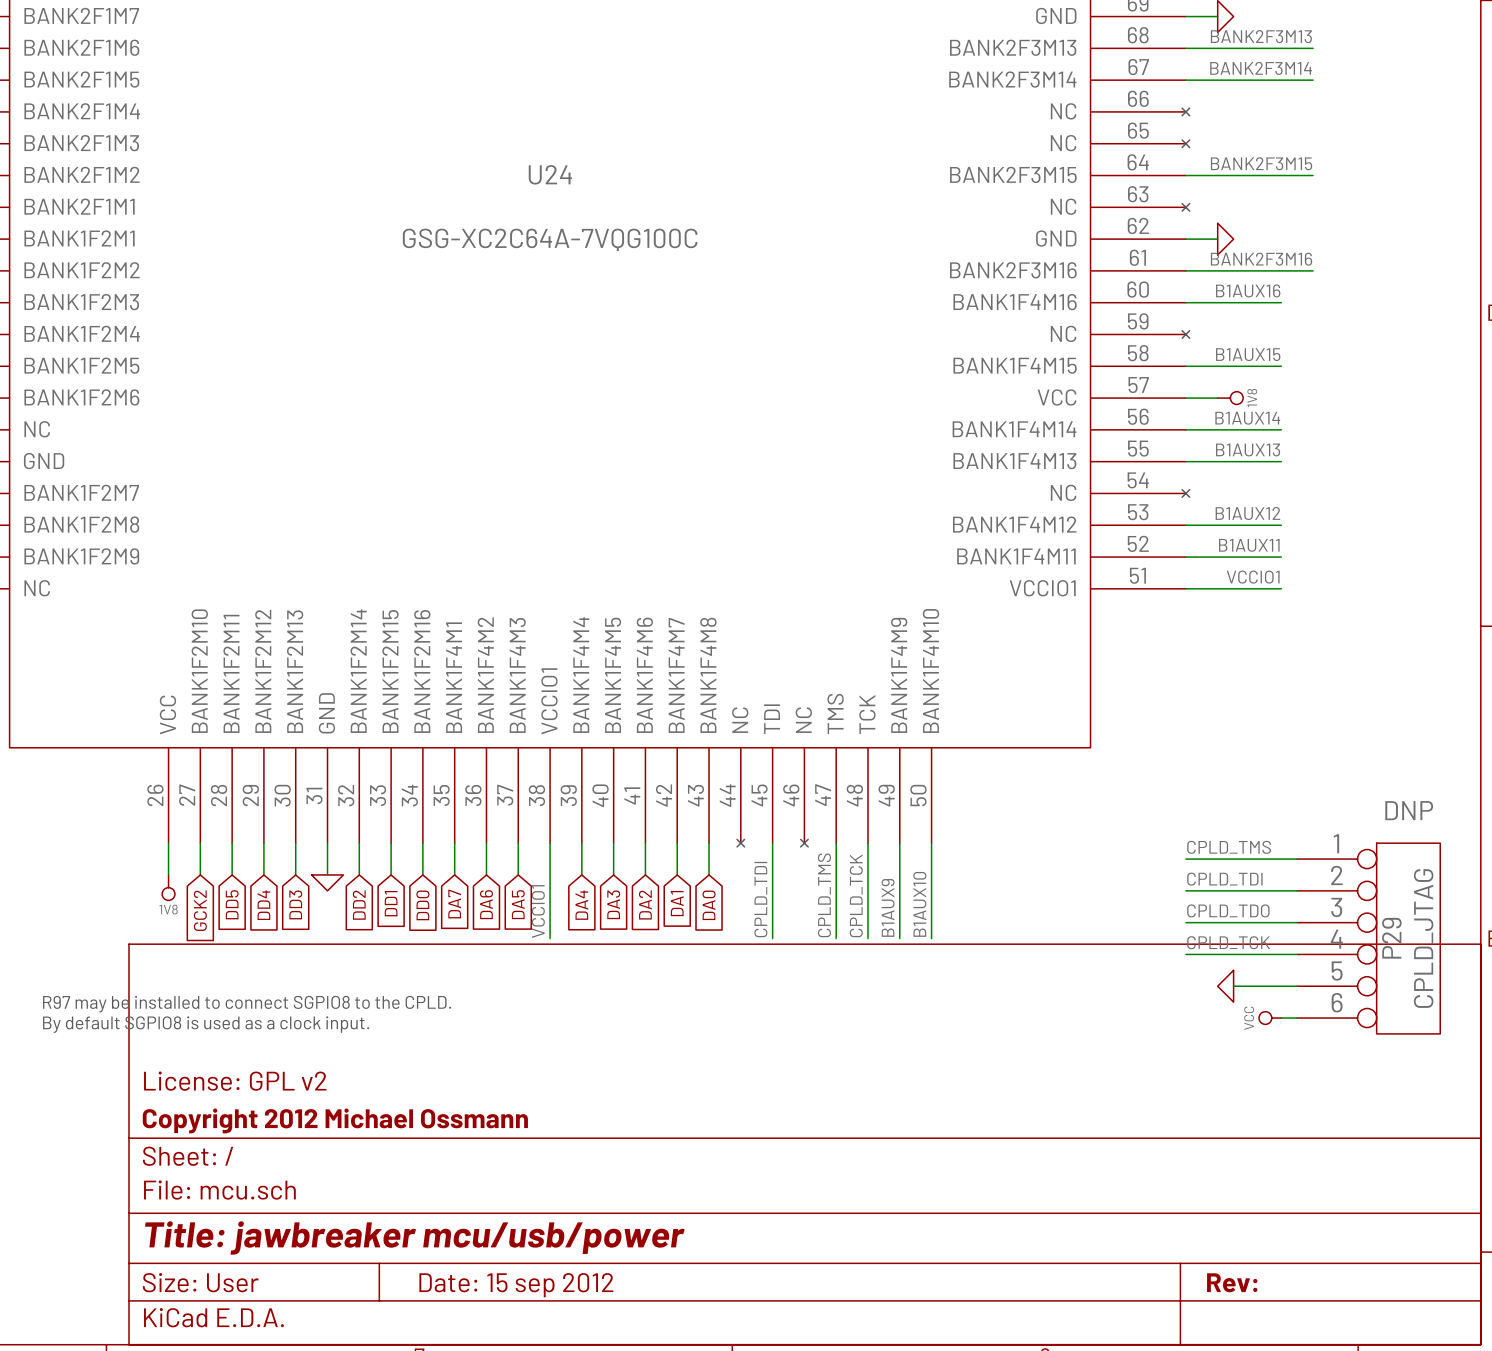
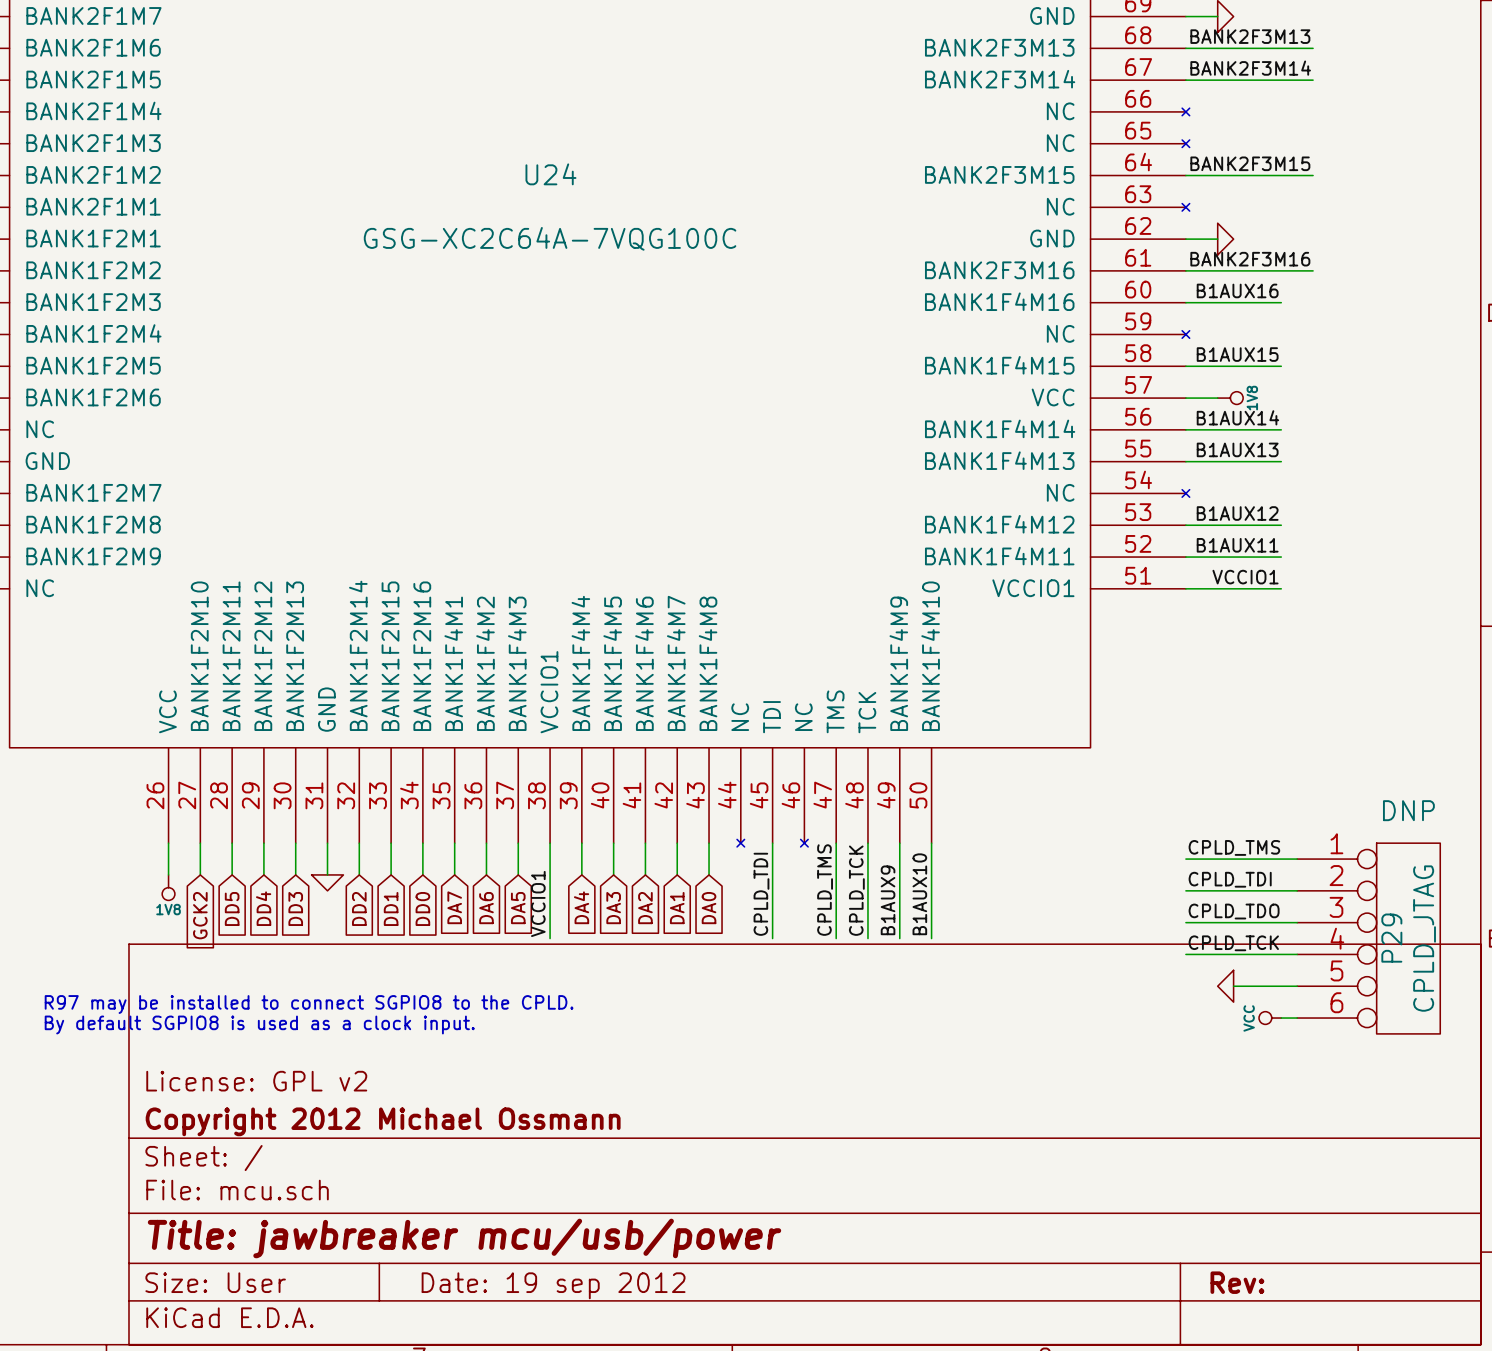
title block: Date: 15 sep 2012 (516, 1285) -> Date: 19 sep 2012 (553, 1285)

